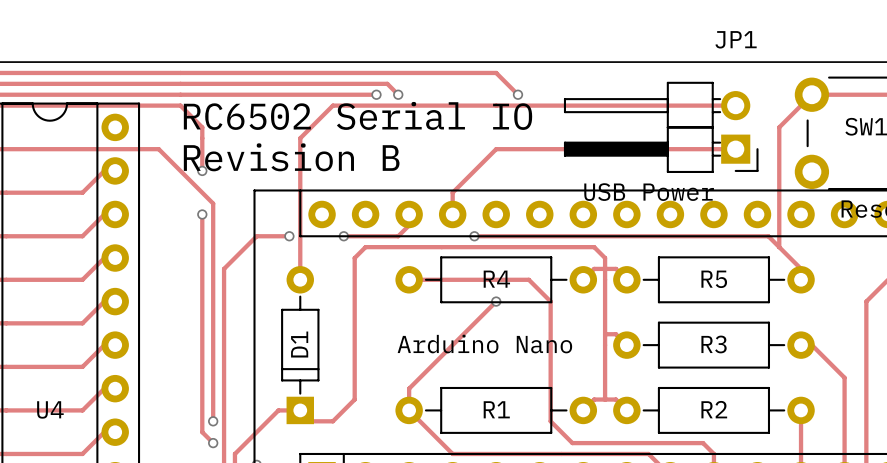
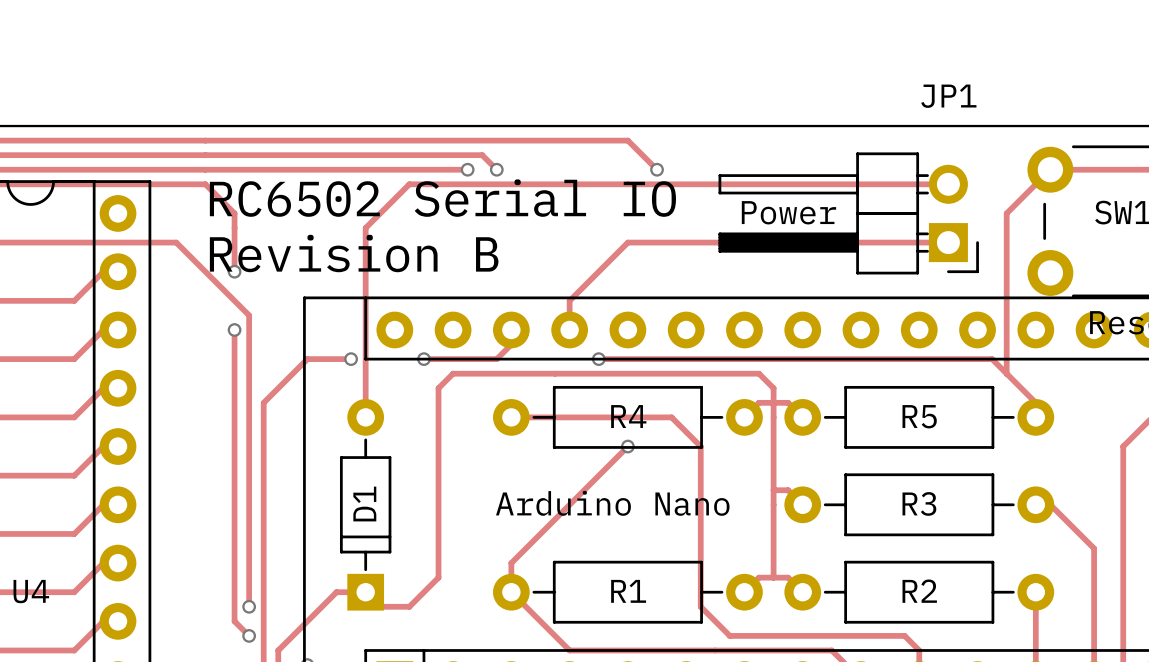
JP1 value: USB Power (649, 192) -> Power (788, 212)

